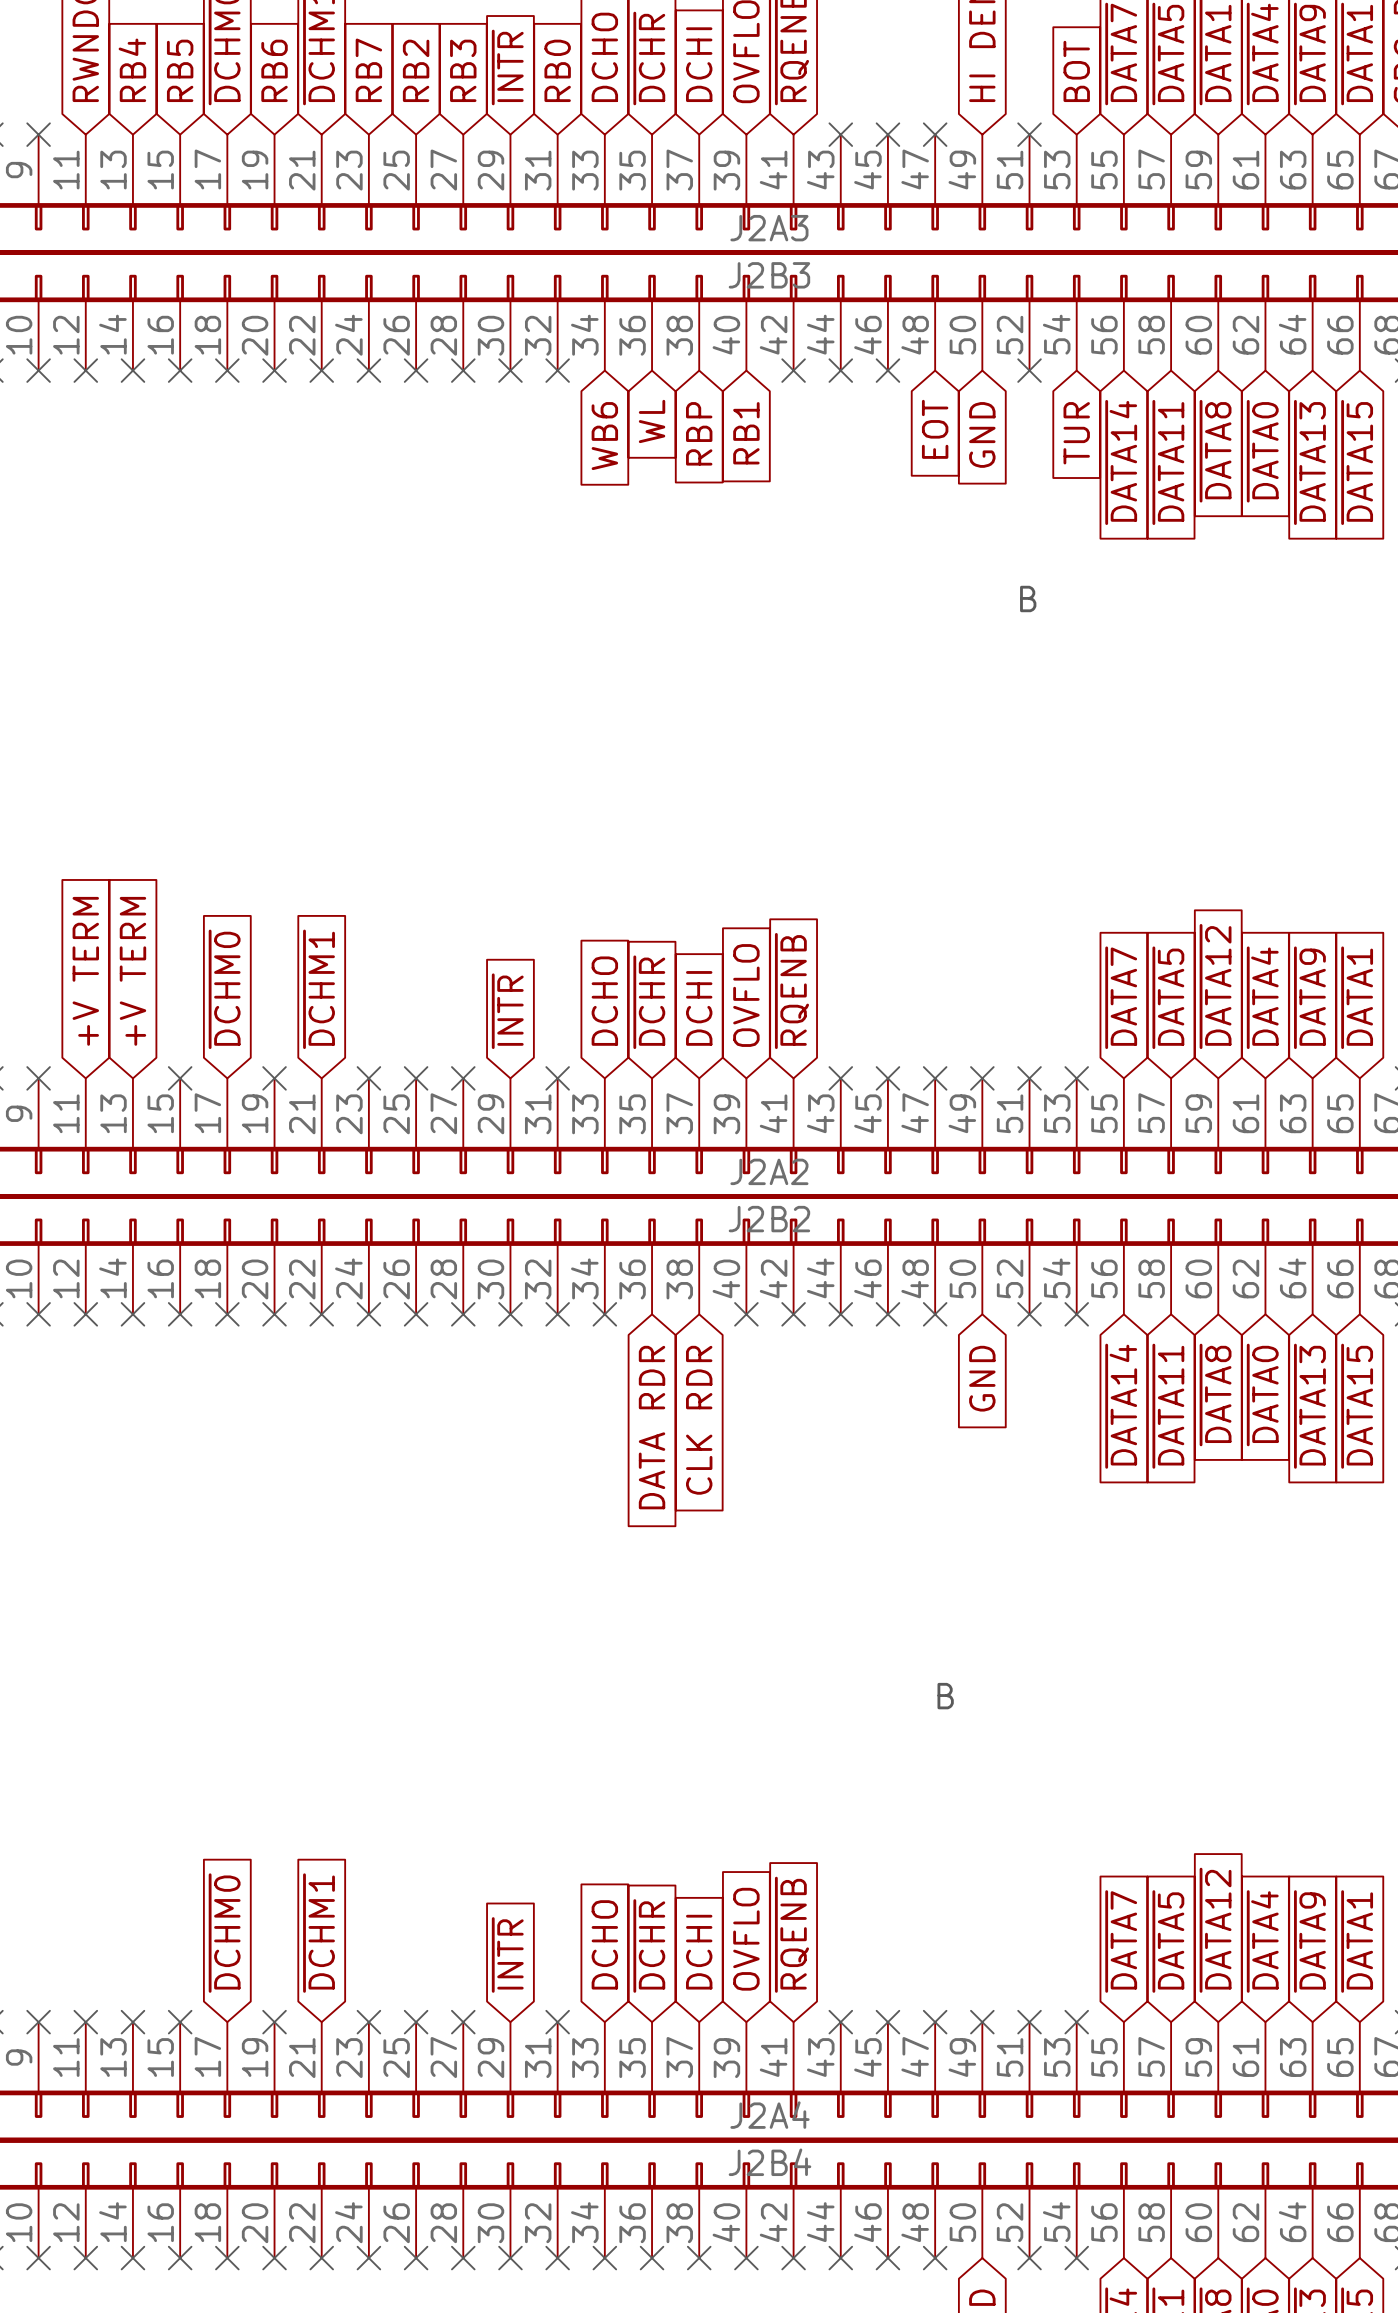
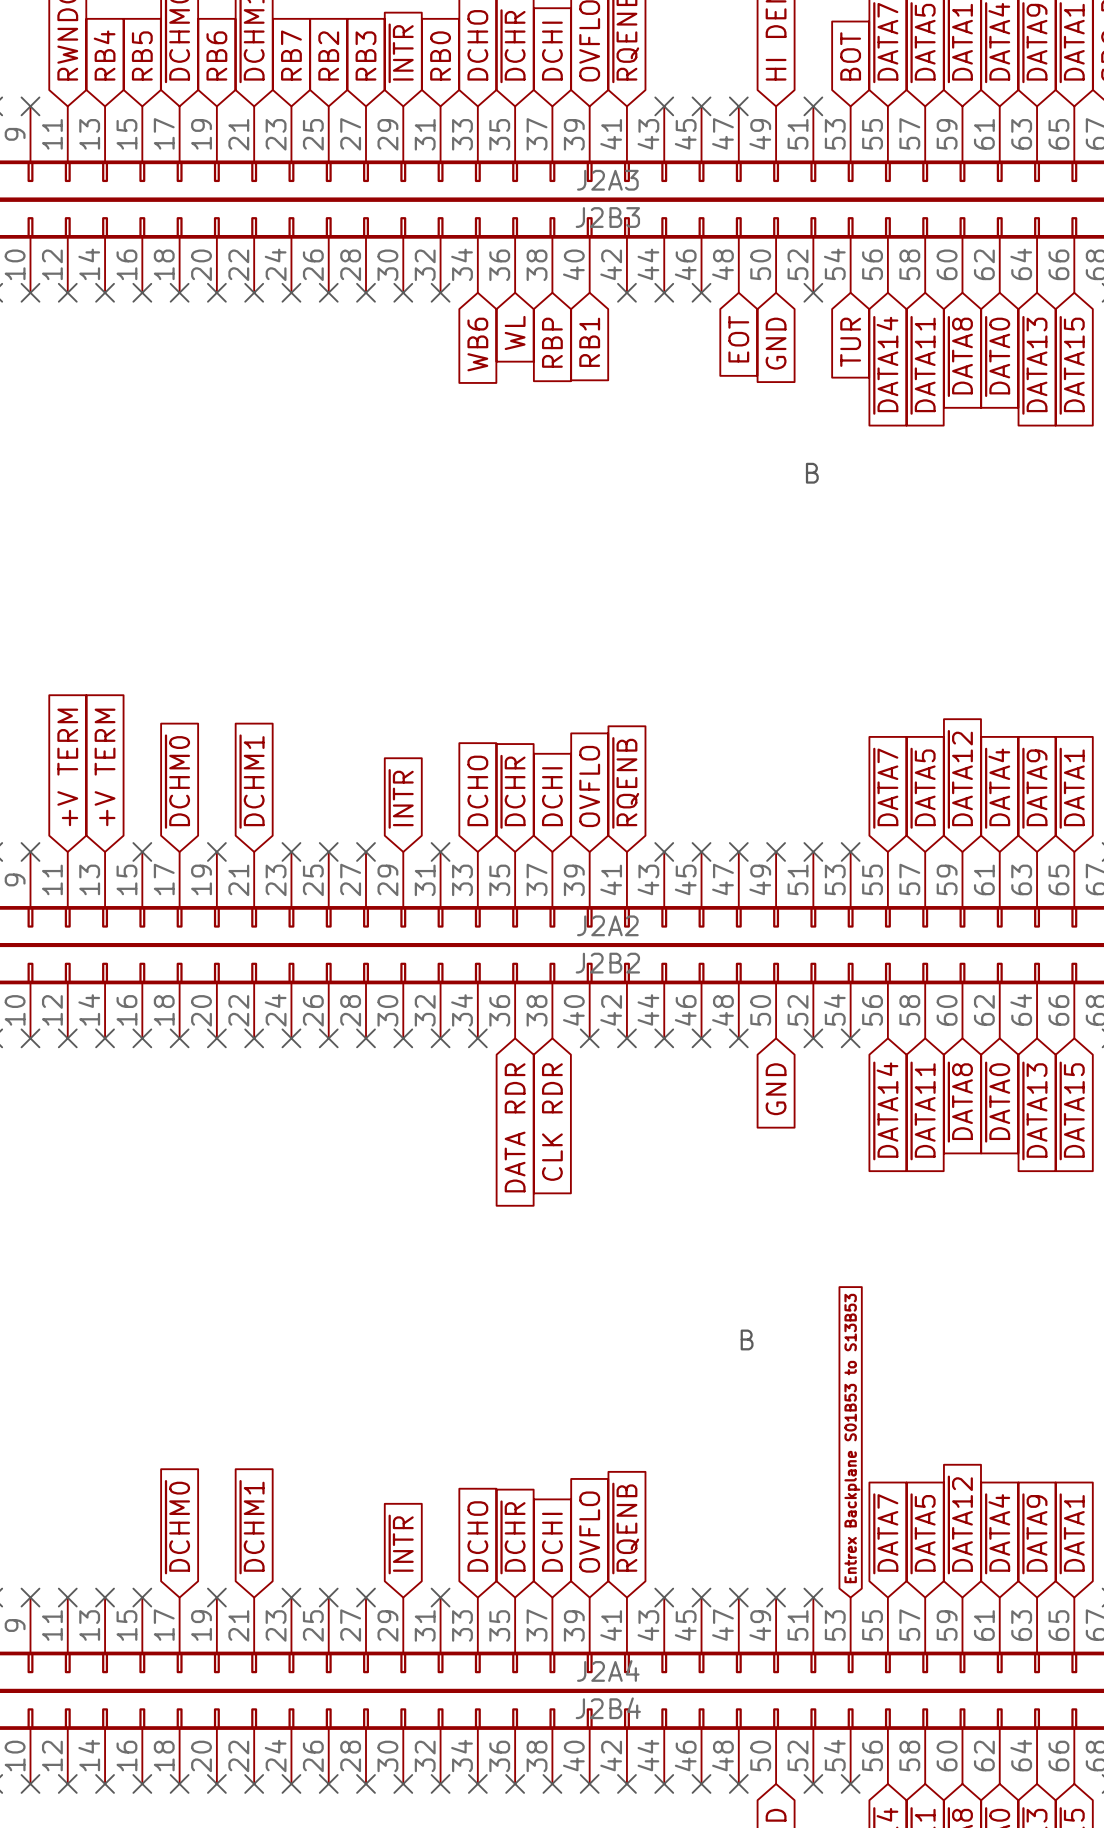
global label: none -> Entrex Backplane S01B53 to S13B53 (852, 1438)
no-connect mark: (1076, 2022) -> none

